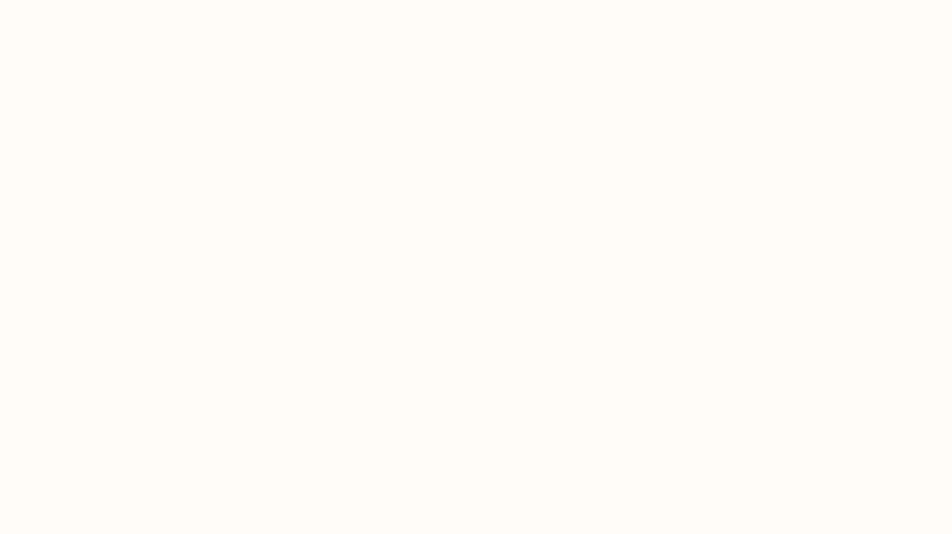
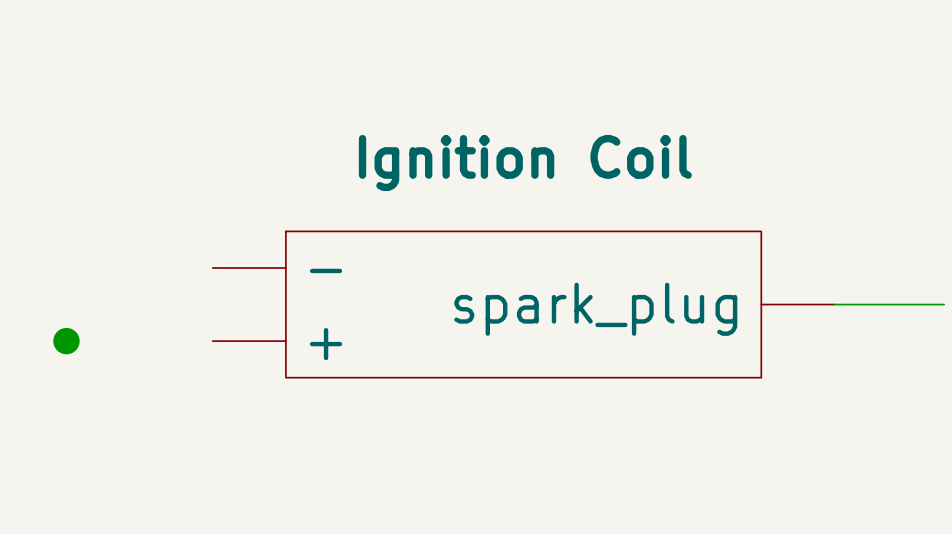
part: none -> Ignition Coil (523, 304)
wire: none -> (834, 304) (944, 304)
junction: none -> (66, 341)

